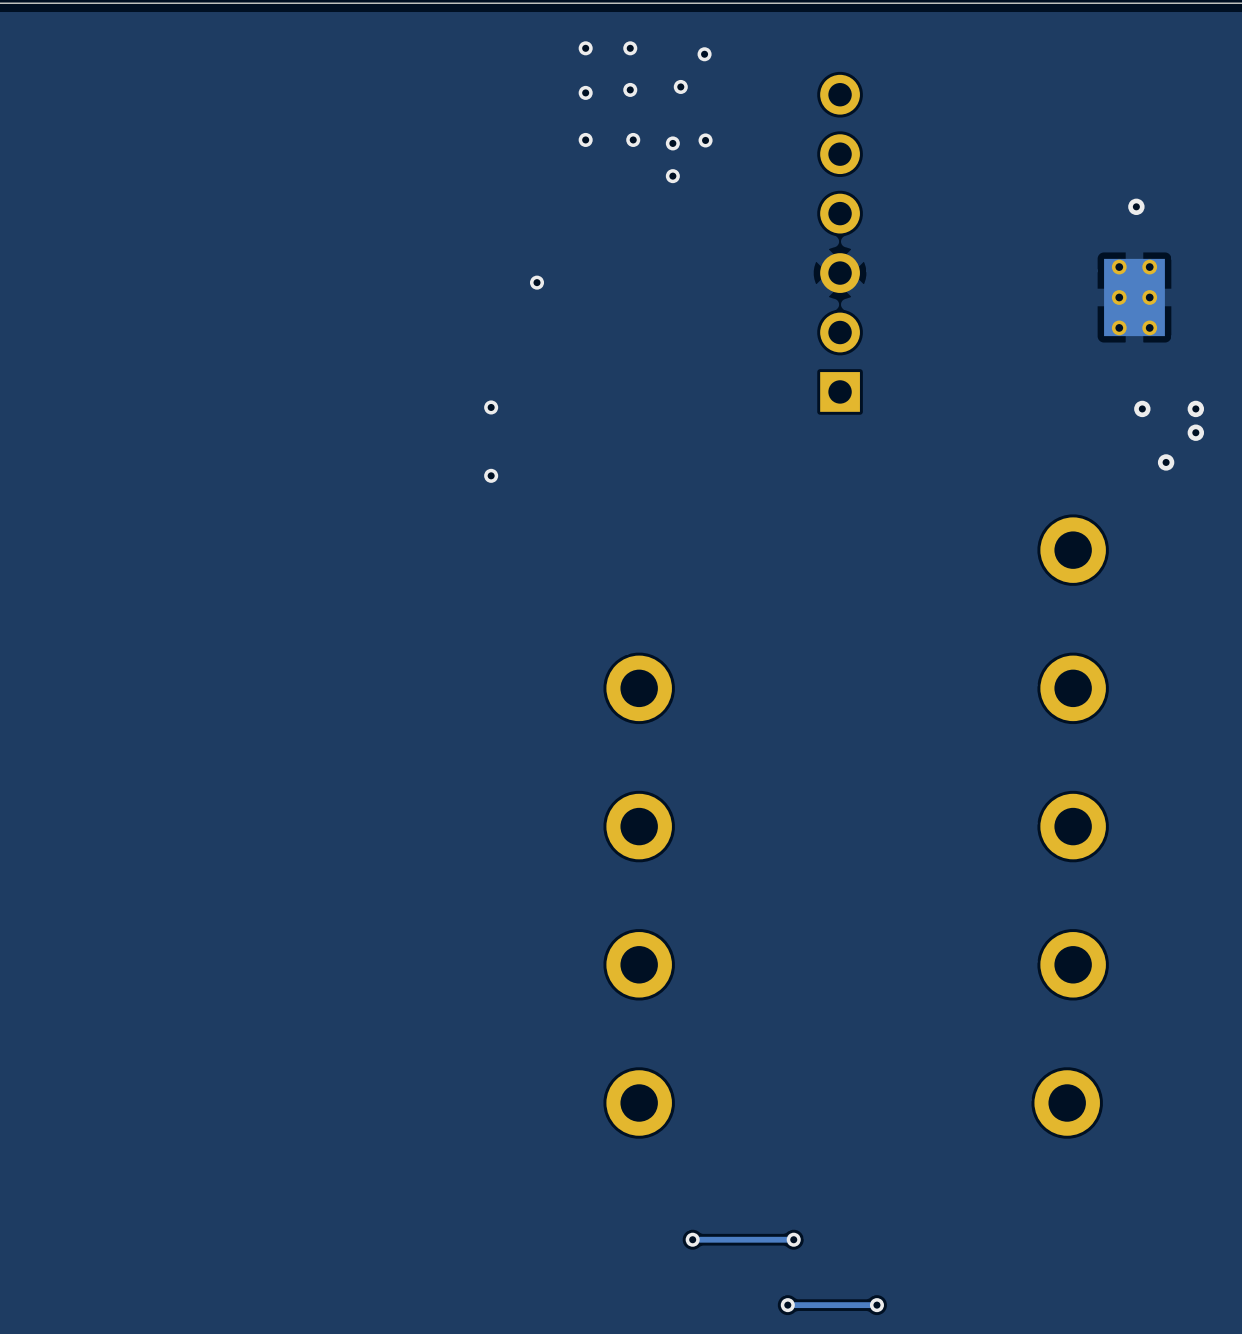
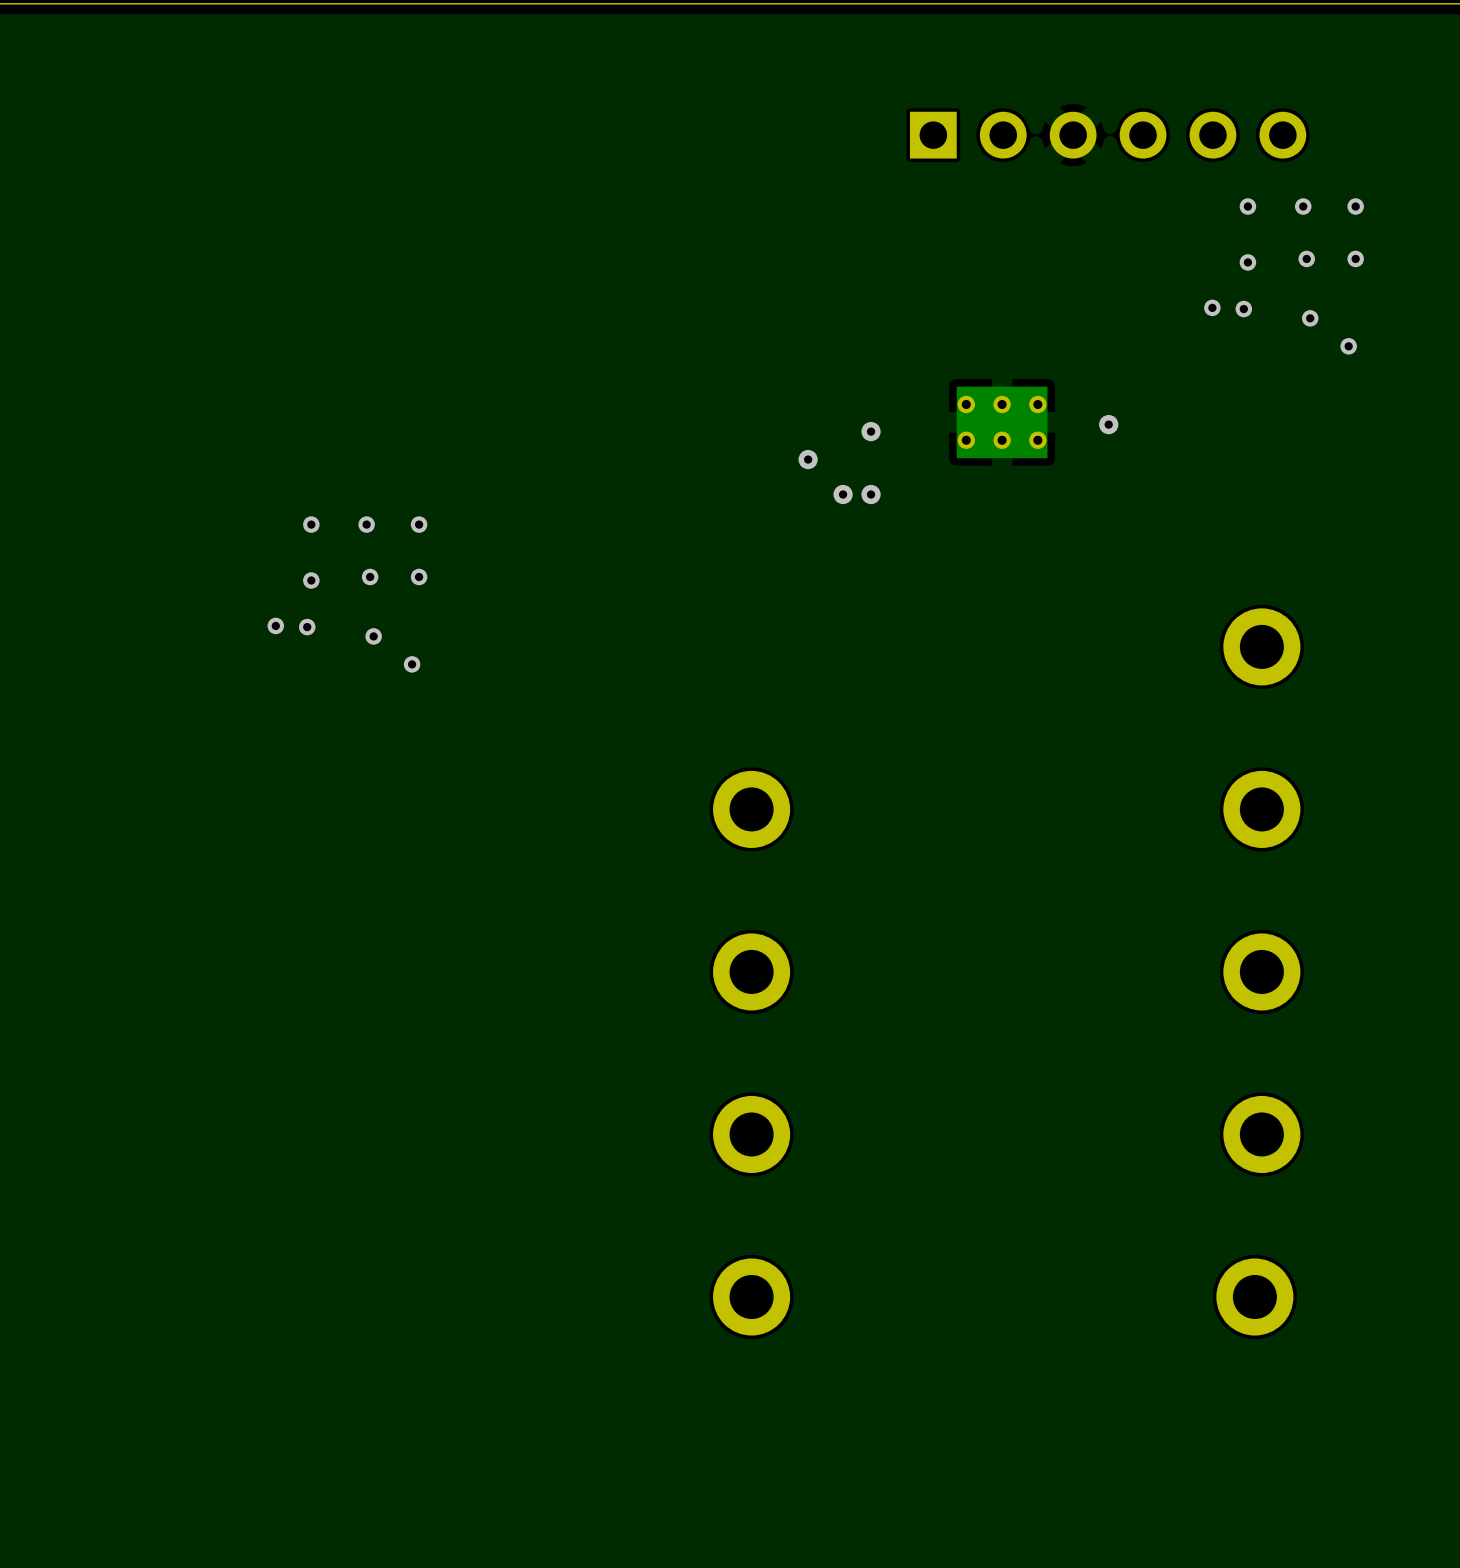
via: (585, 48) -> none
via: (630, 48) -> none
via: (704, 54) -> none
via: (680, 86) -> none
via: (630, 89) -> none
via: (585, 92) -> none
via: (585, 139) -> none
via: (633, 139) -> none
via: (705, 140) -> none
via: (672, 143) -> none
via: none -> (1247, 206)
via: none -> (1303, 206)
via: none -> (1355, 206)
via: (672, 176) -> none
via: (1136, 206) -> none
via: none -> (1306, 258)
via: none -> (1355, 258)
via: none -> (1247, 262)
part rotation: 0° (840, 243) -> 90° clockwise (1108, 135)
via: none -> (1212, 307)
via: none -> (1243, 309)
via: none -> (1310, 318)
via: (537, 282) -> none
via: none -> (1348, 346)
part rotation: 0° (1134, 297) -> 90° clockwise (1002, 422)
part position: (1134, 297) -> (1002, 422)
via: none -> (1108, 424)
via: none -> (871, 431)
via: none -> (808, 459)
via: (491, 407) -> none
via: (1142, 408) -> none
via: (1195, 408) -> none
via: none -> (843, 494)
via: none -> (871, 494)
via: (1195, 432) -> none
via: none -> (311, 524)
via: none -> (366, 524)
via: none -> (419, 524)
via: (1166, 462) -> none
via: (491, 475) -> none
via: none -> (370, 577)
via: none -> (419, 577)
via: none -> (311, 580)
via: none -> (275, 625)
via: none -> (307, 627)
via: none -> (373, 636)
via: none -> (412, 664)
via: (692, 1239) -> none
track: (793, 1239) (692, 1239) -> none
via: (793, 1239) -> none
via: (787, 1305) -> none
track: (876, 1305) (787, 1305) -> none
via: (876, 1305) -> none

